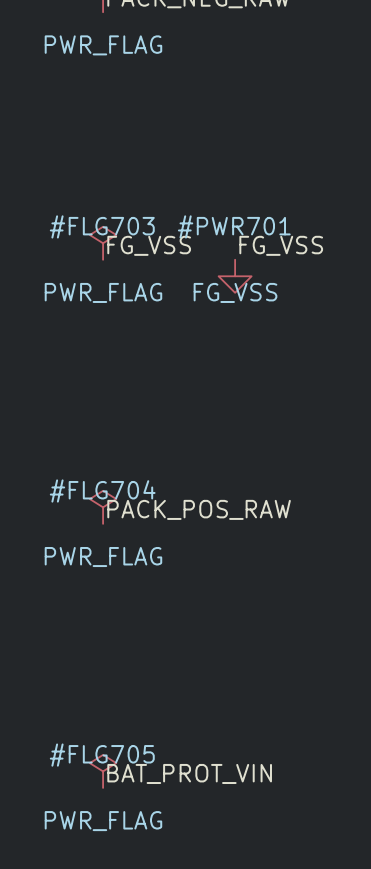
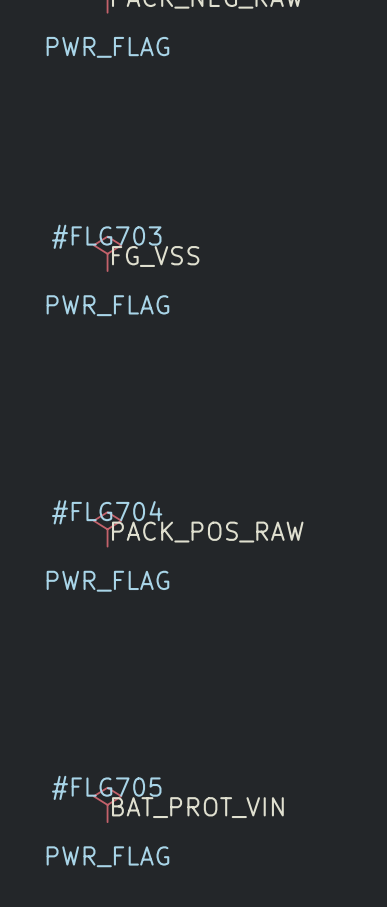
label: FG_VSS (281, 245) -> none
#PWR701: FG_VSS (235, 276) -> none

